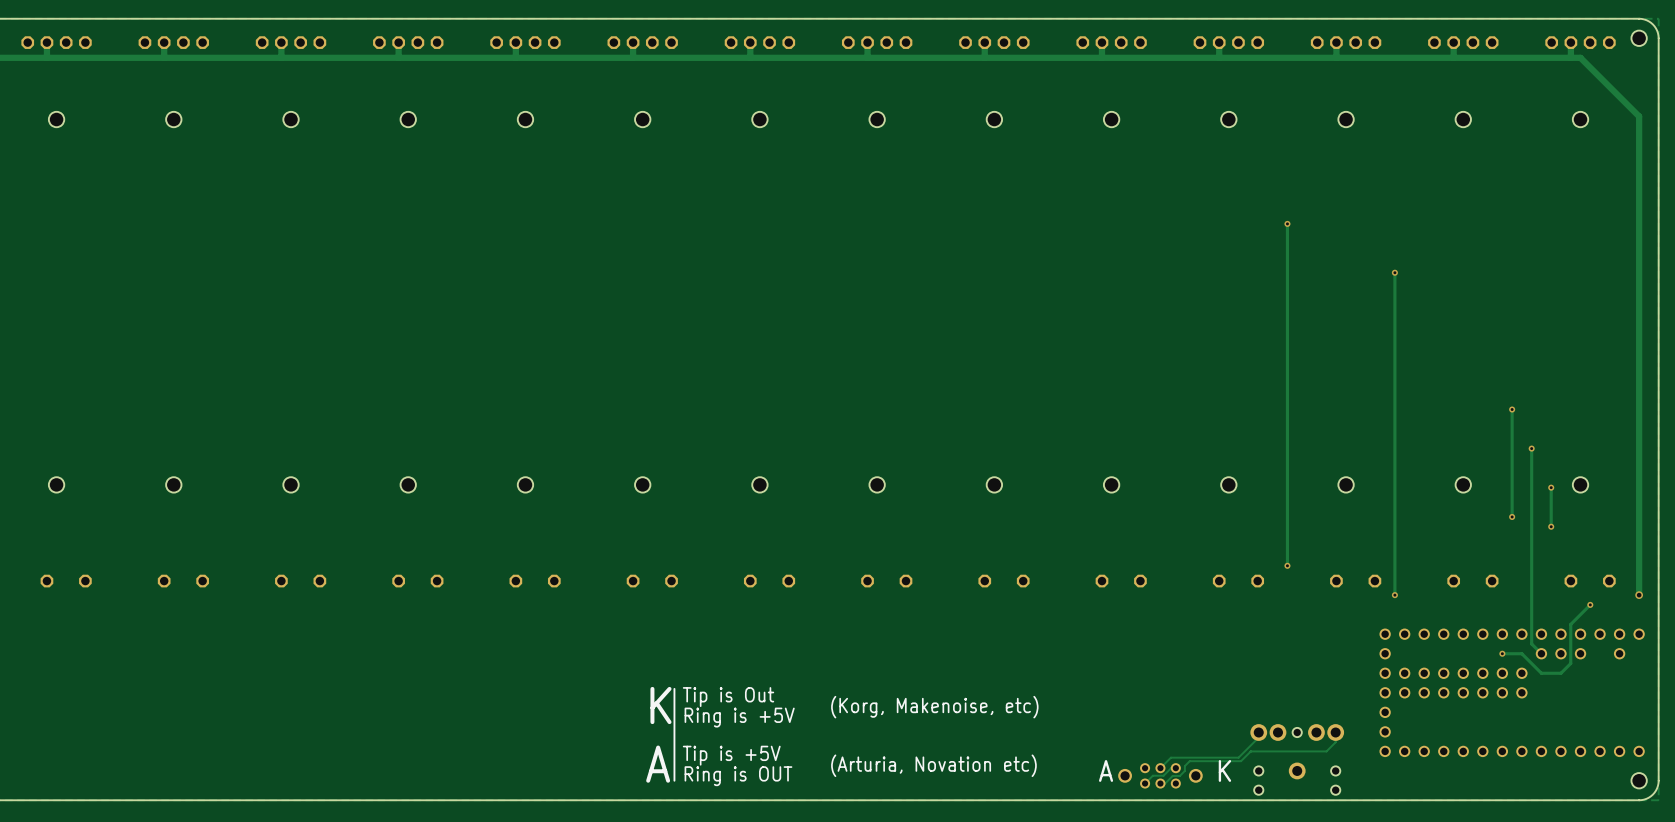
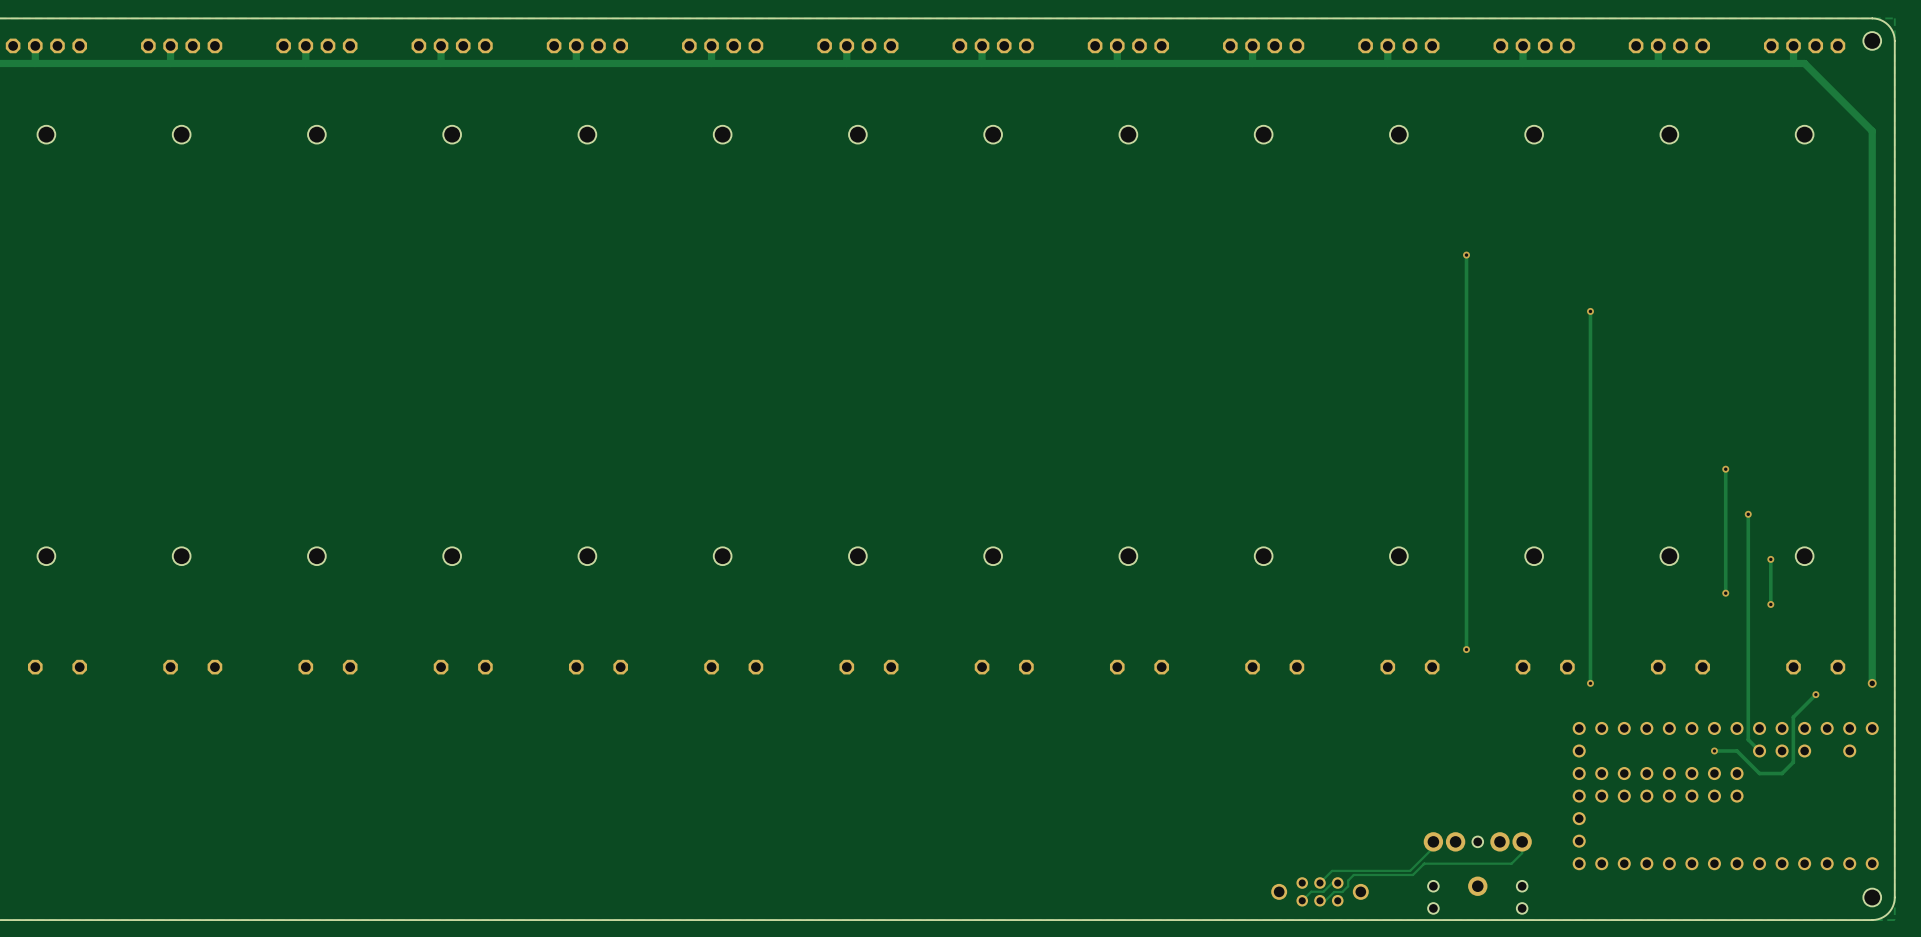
line: (674, 688) (674, 780) -> none
text: Tip is Out (728, 697) -> none
text: K (660, 705) -> none
text: (Korg, Makenoise, etc) (934, 707) -> none
text: Ring is +5V (739, 717) -> none
text: Tip is +5V (731, 755) -> none
text: A (658, 764) -> none
text: (Arturia, Novation etc) (933, 765) -> none
text: A (1106, 770) -> none
text: K (1224, 770) -> none
text: Ring is OUT (738, 776) -> none

